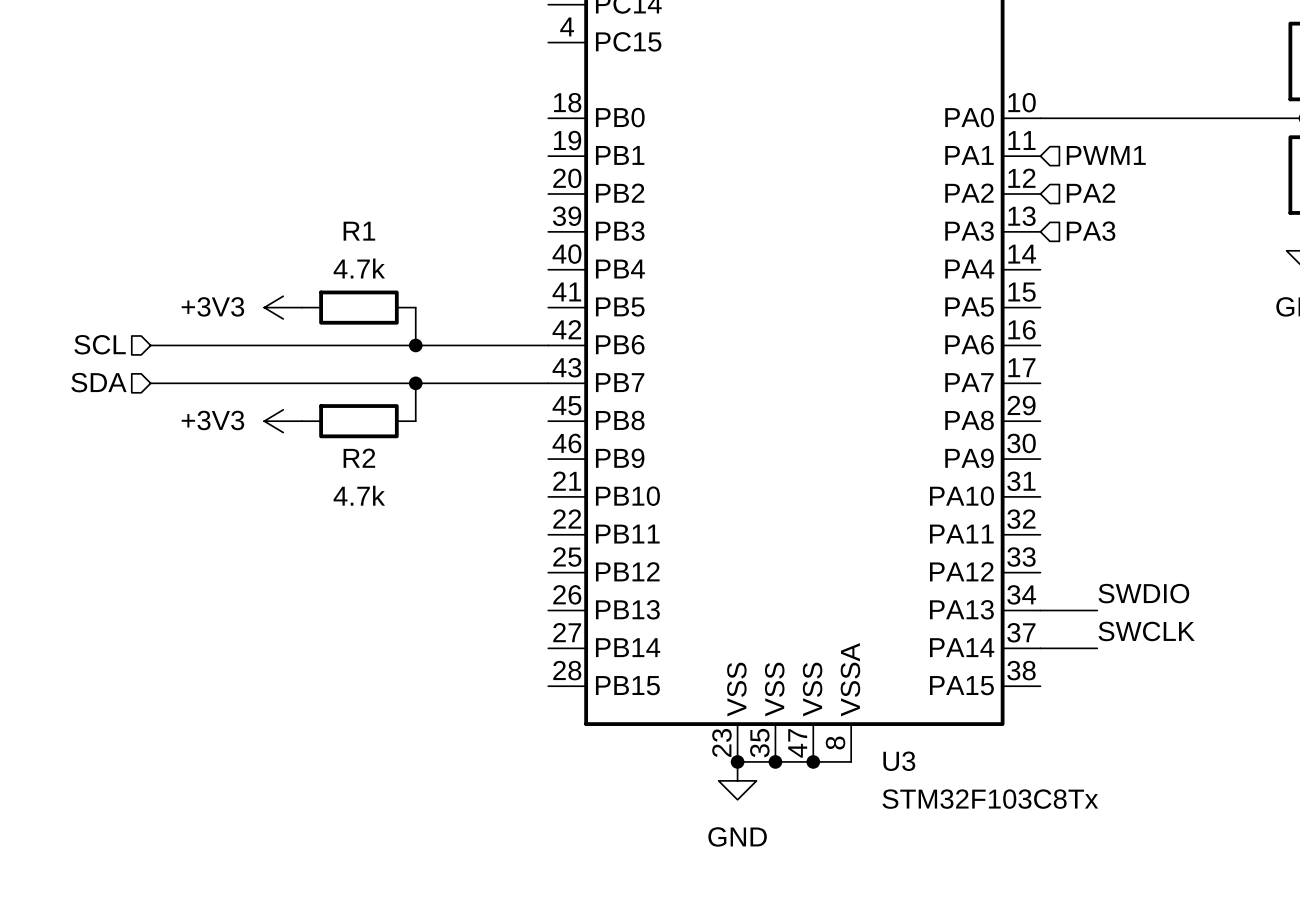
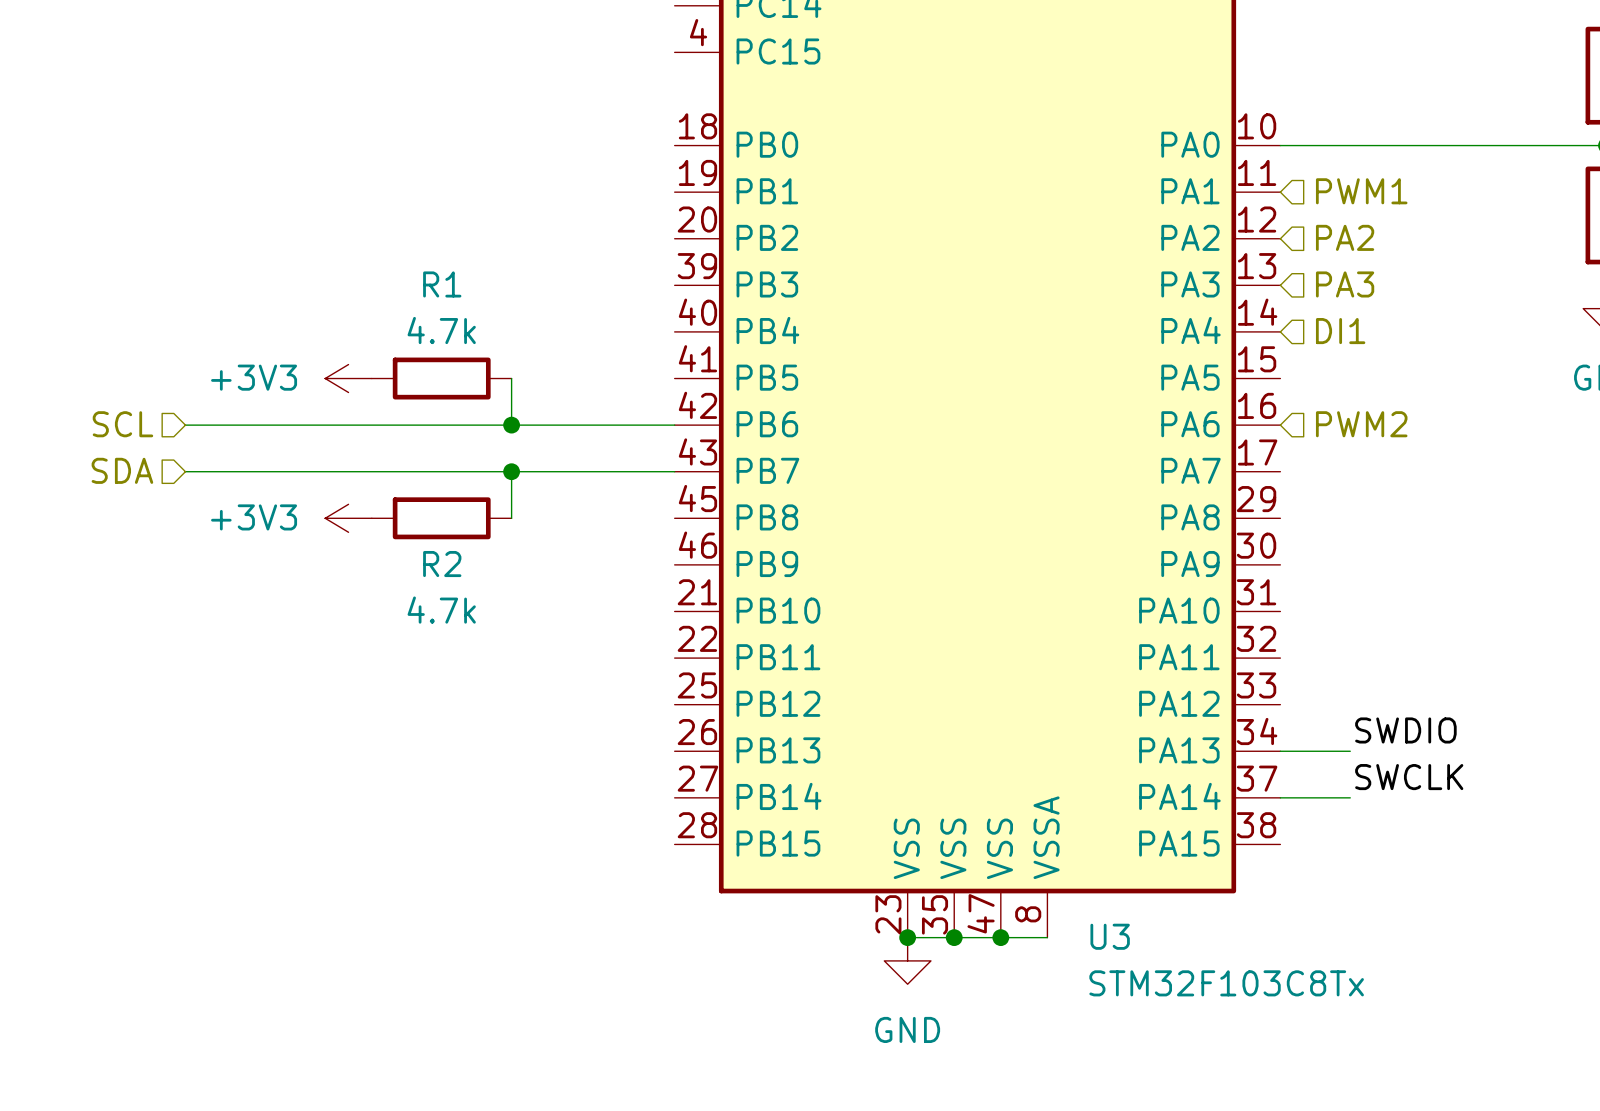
hierarchical label: none -> DI1 (1340, 331)
hierarchical label: none -> PWM2 (1361, 424)

